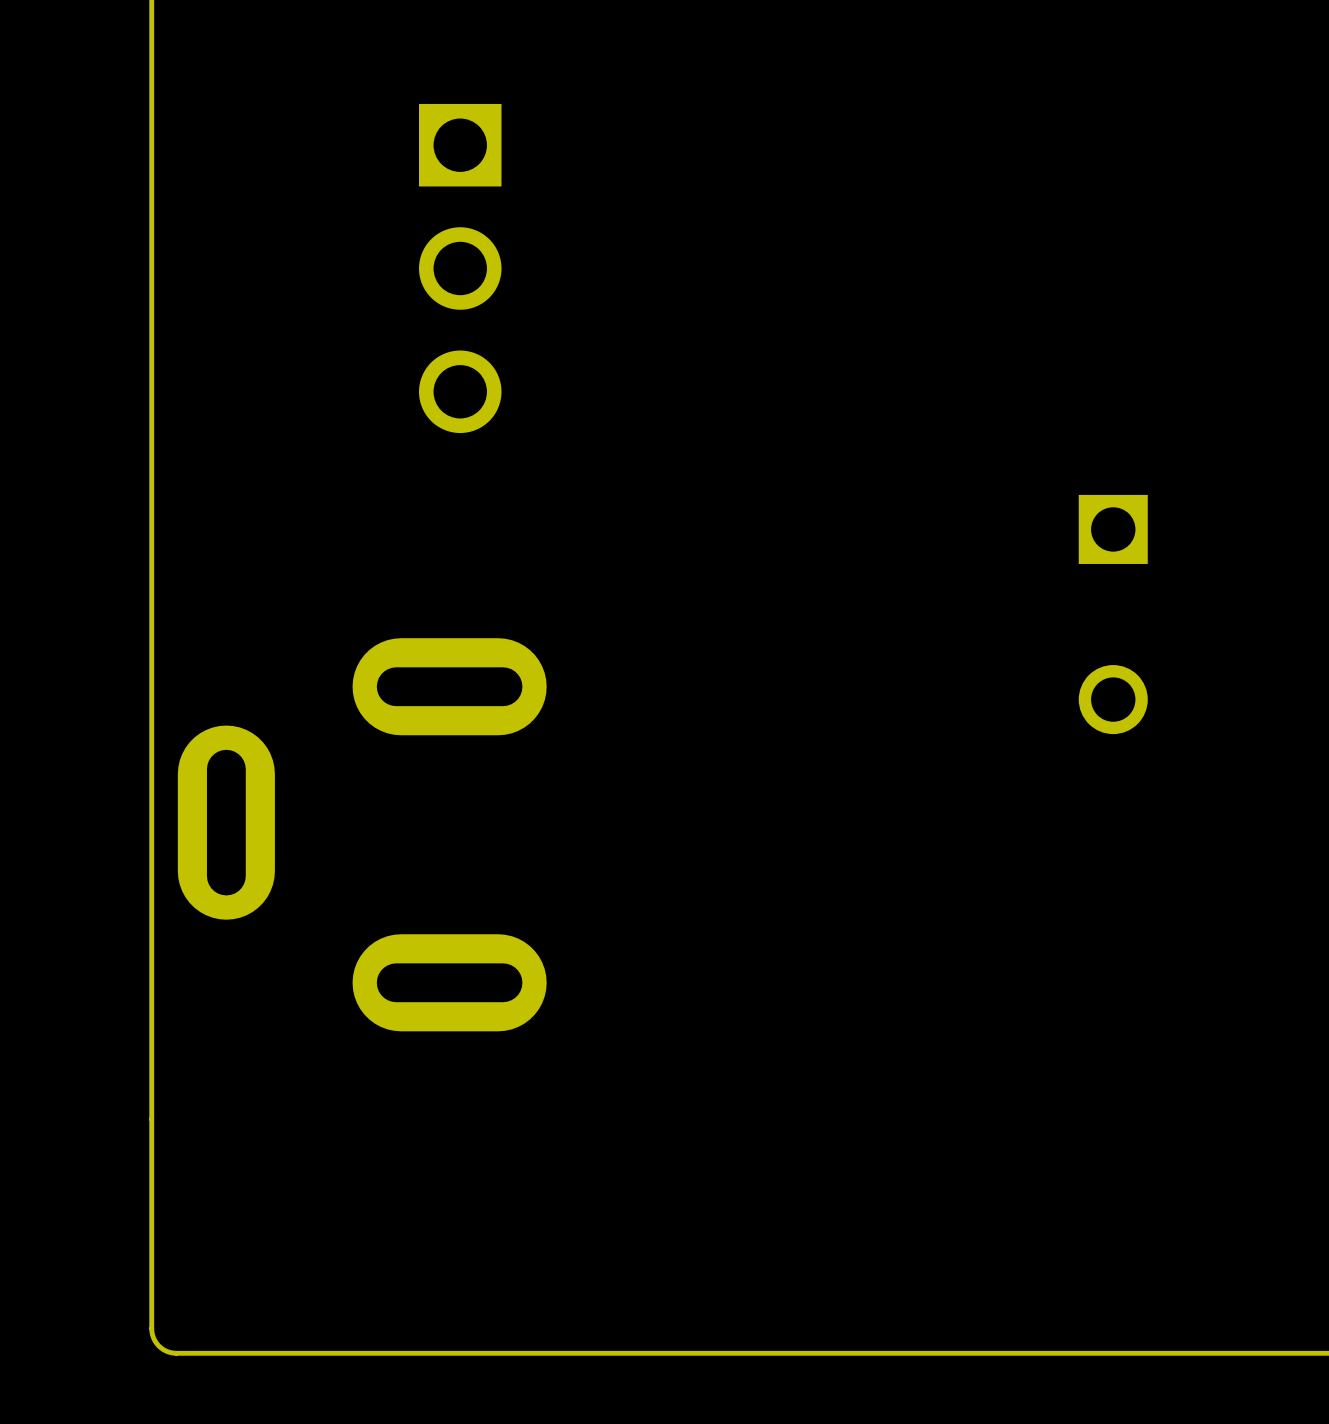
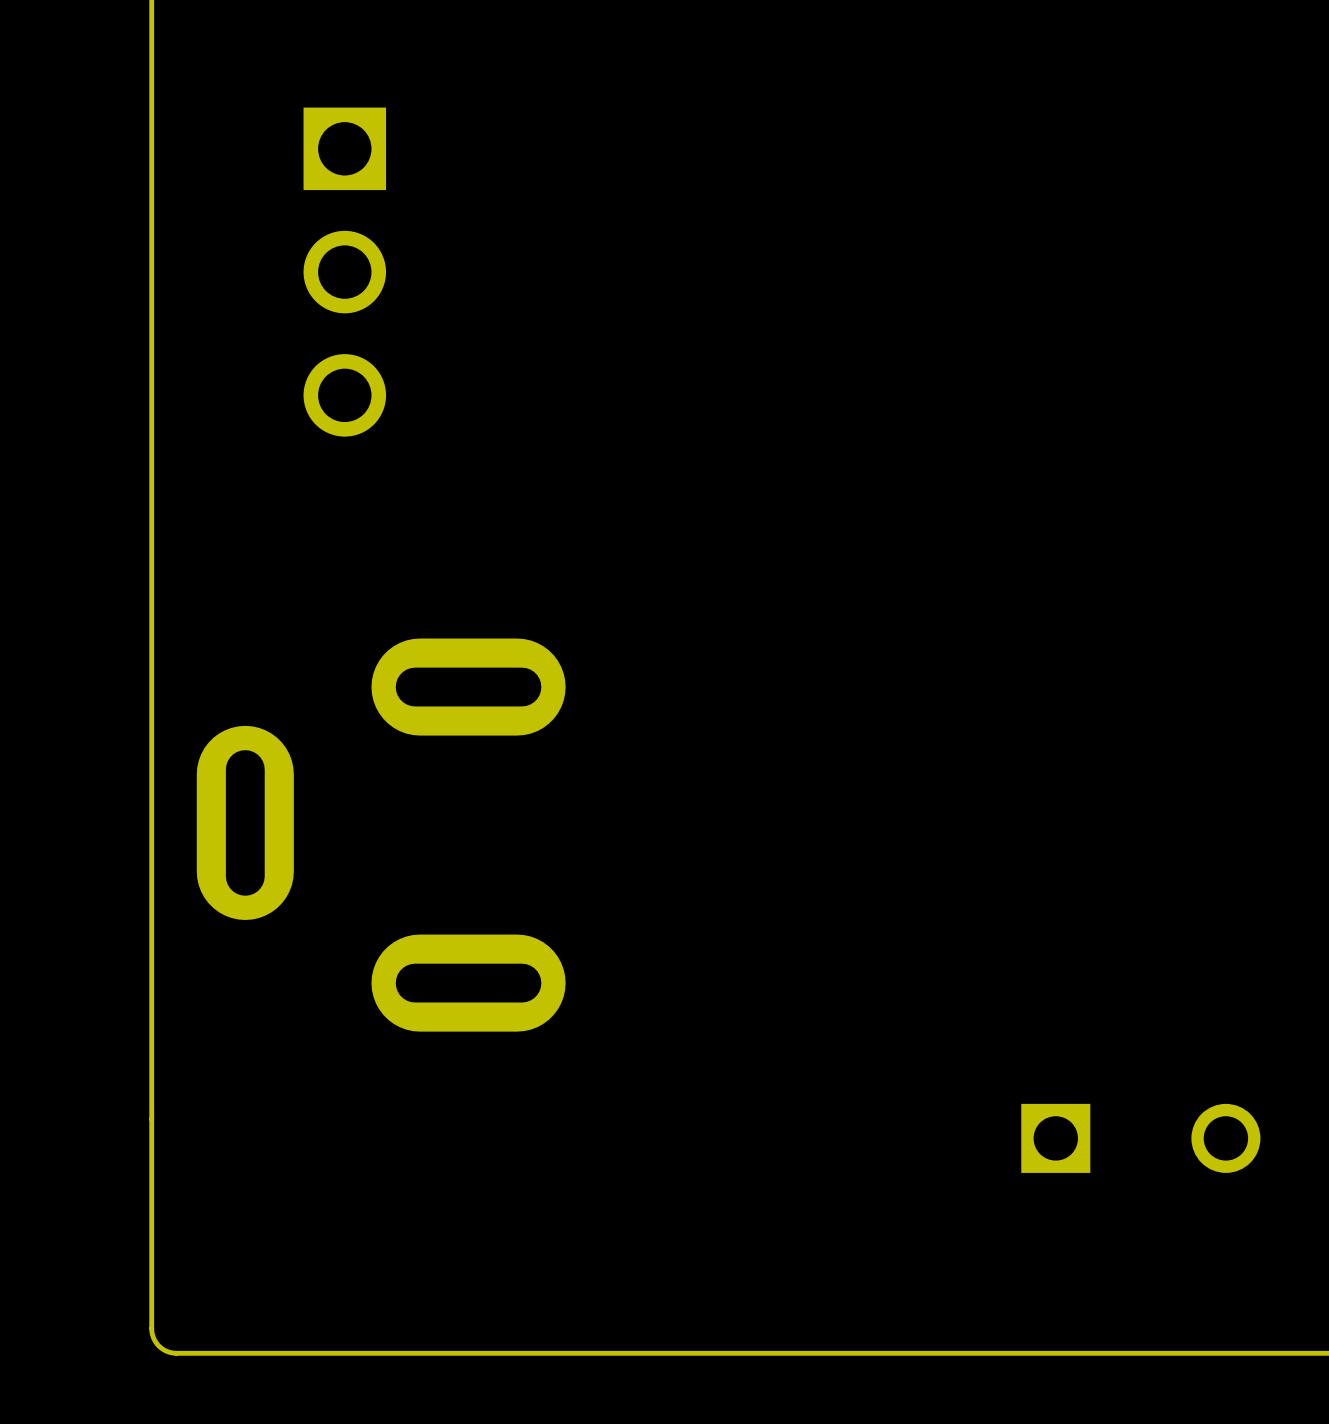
part position: (460, 268) -> (344, 272)
part rotation: 0° (1113, 614) -> 90° counterclockwise (1140, 1138)
part position: (1113, 614) -> (1140, 1138)
part footprint: [177, 638, 547, 1032] -> [196, 638, 566, 1032]

